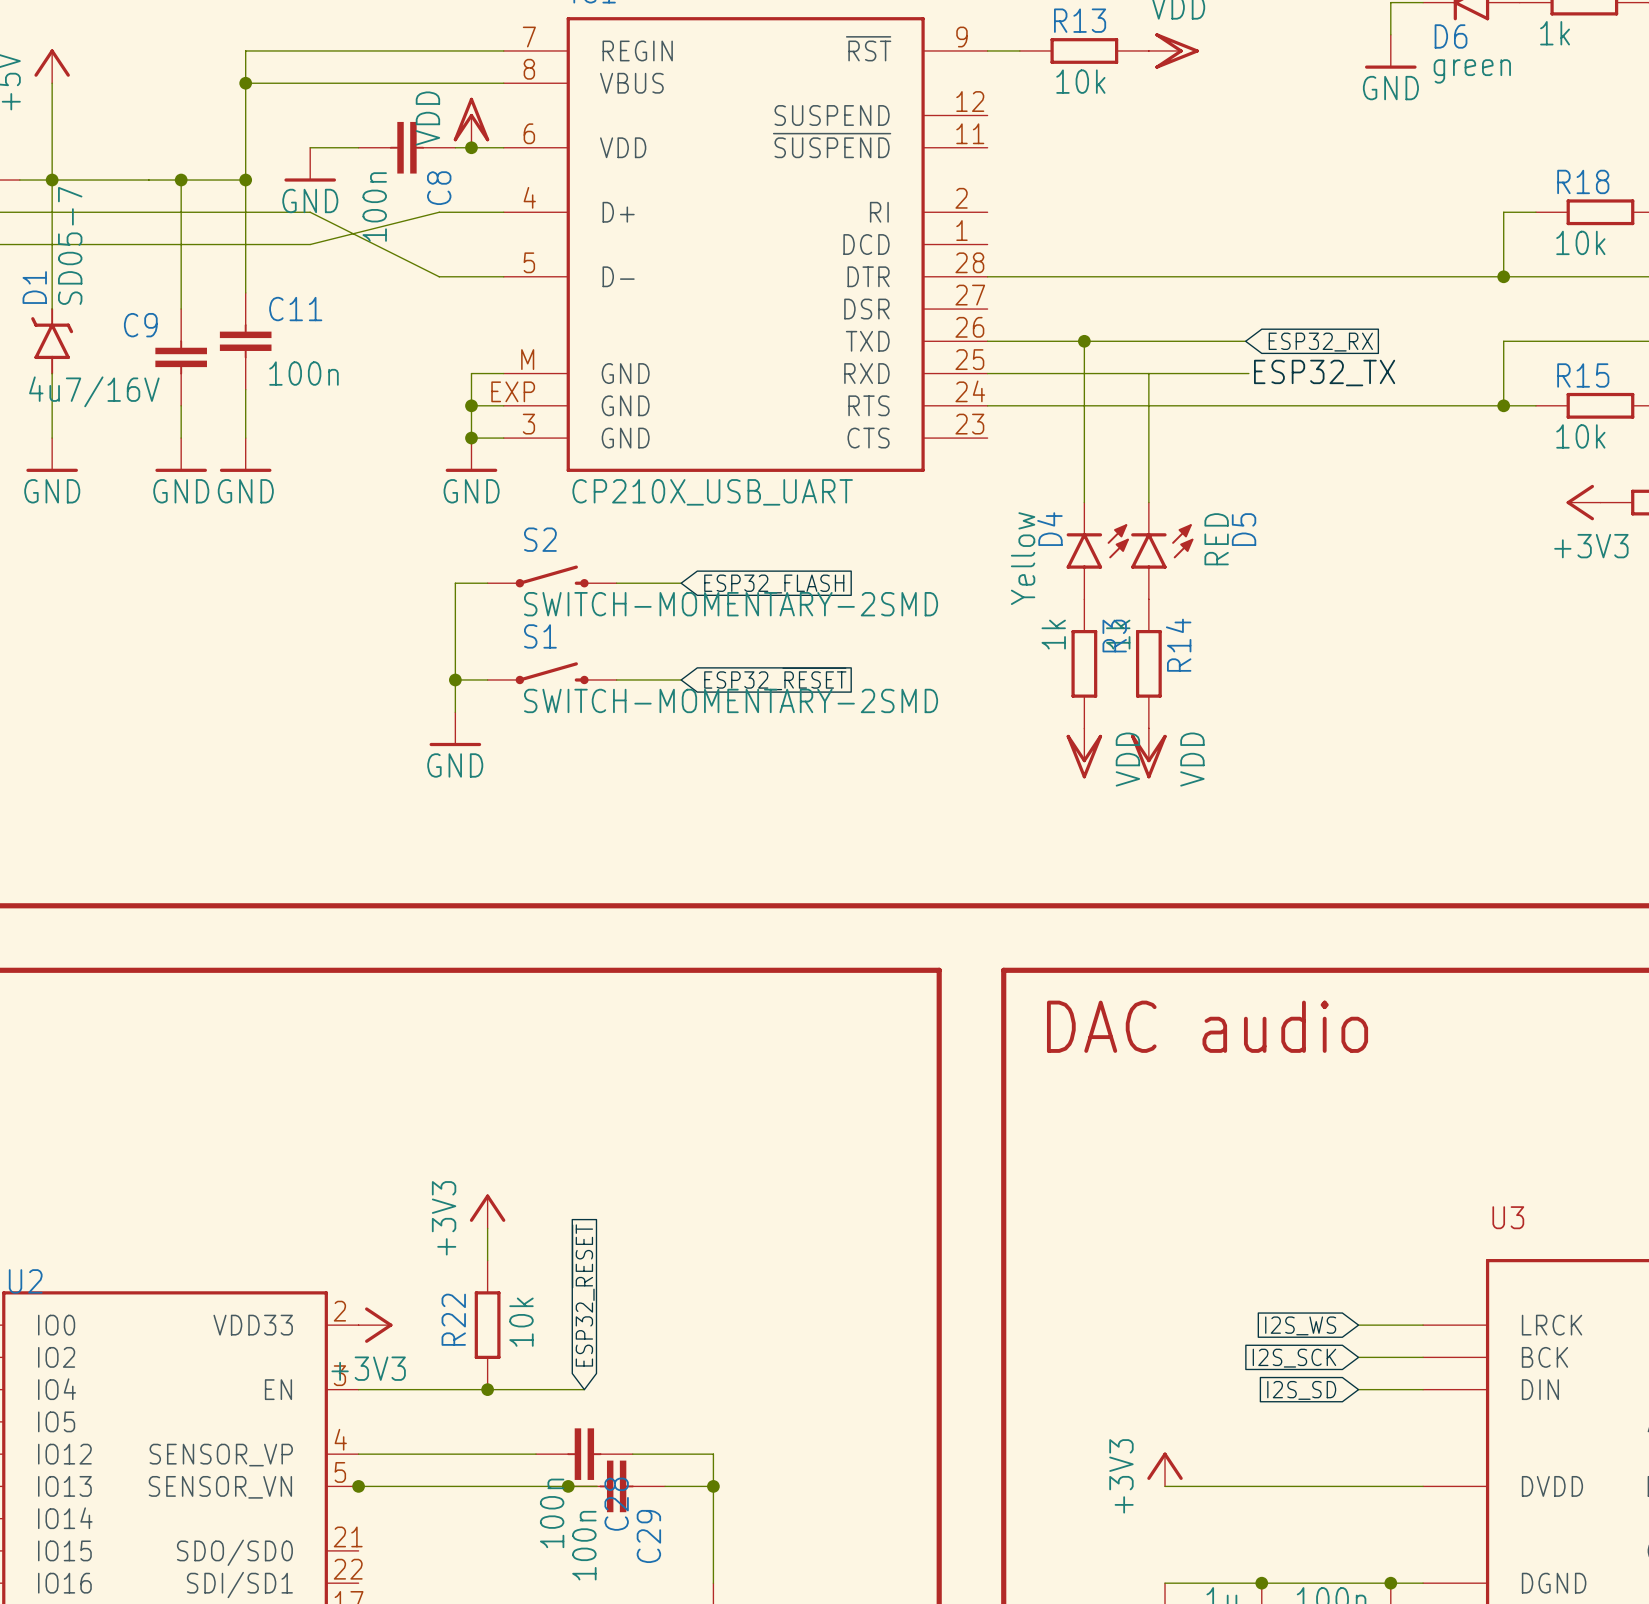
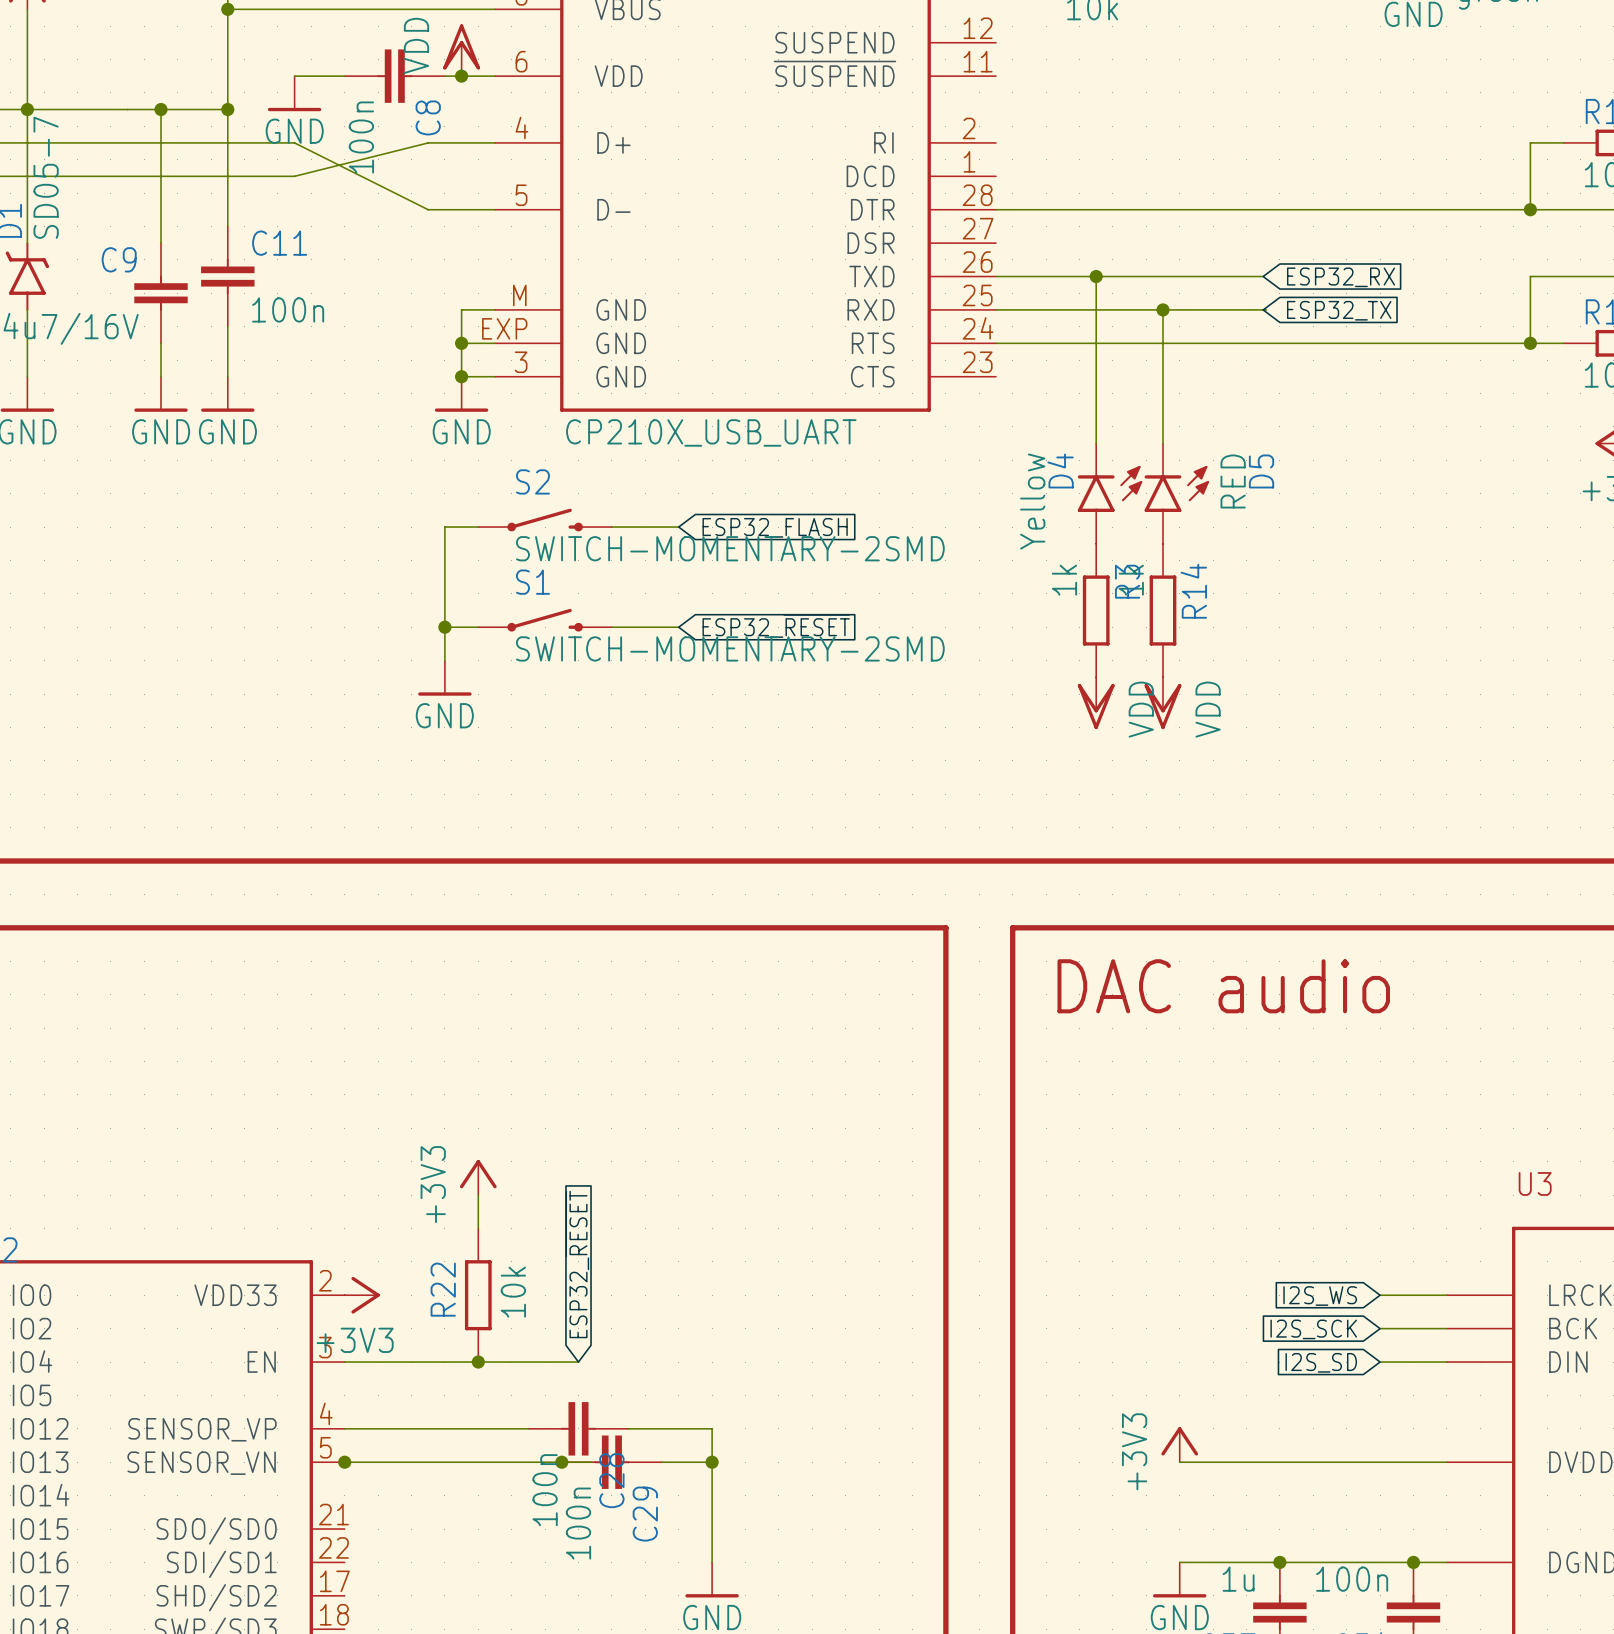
junction: none -> (1162, 309)
label: ESP32_TX (1324, 373) -> none
global label: none -> ESP32_TX (1339, 310)

